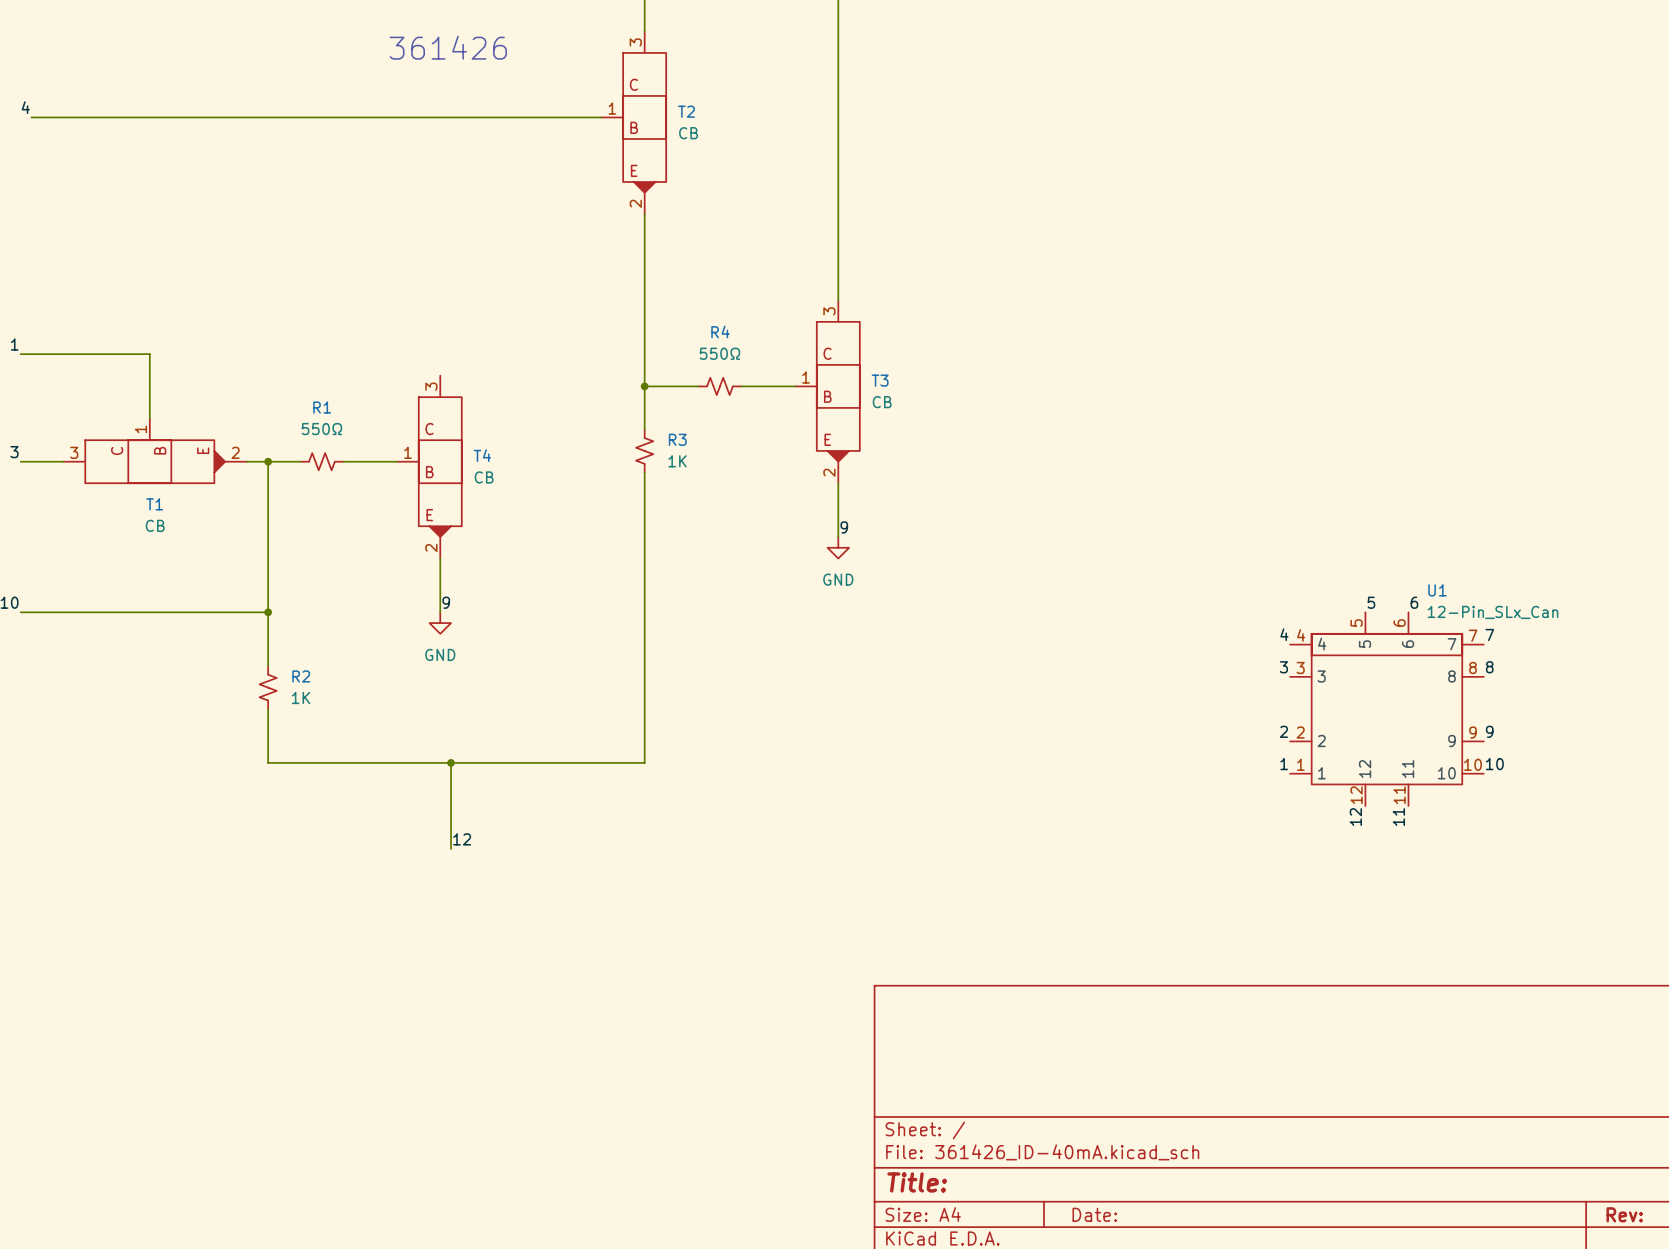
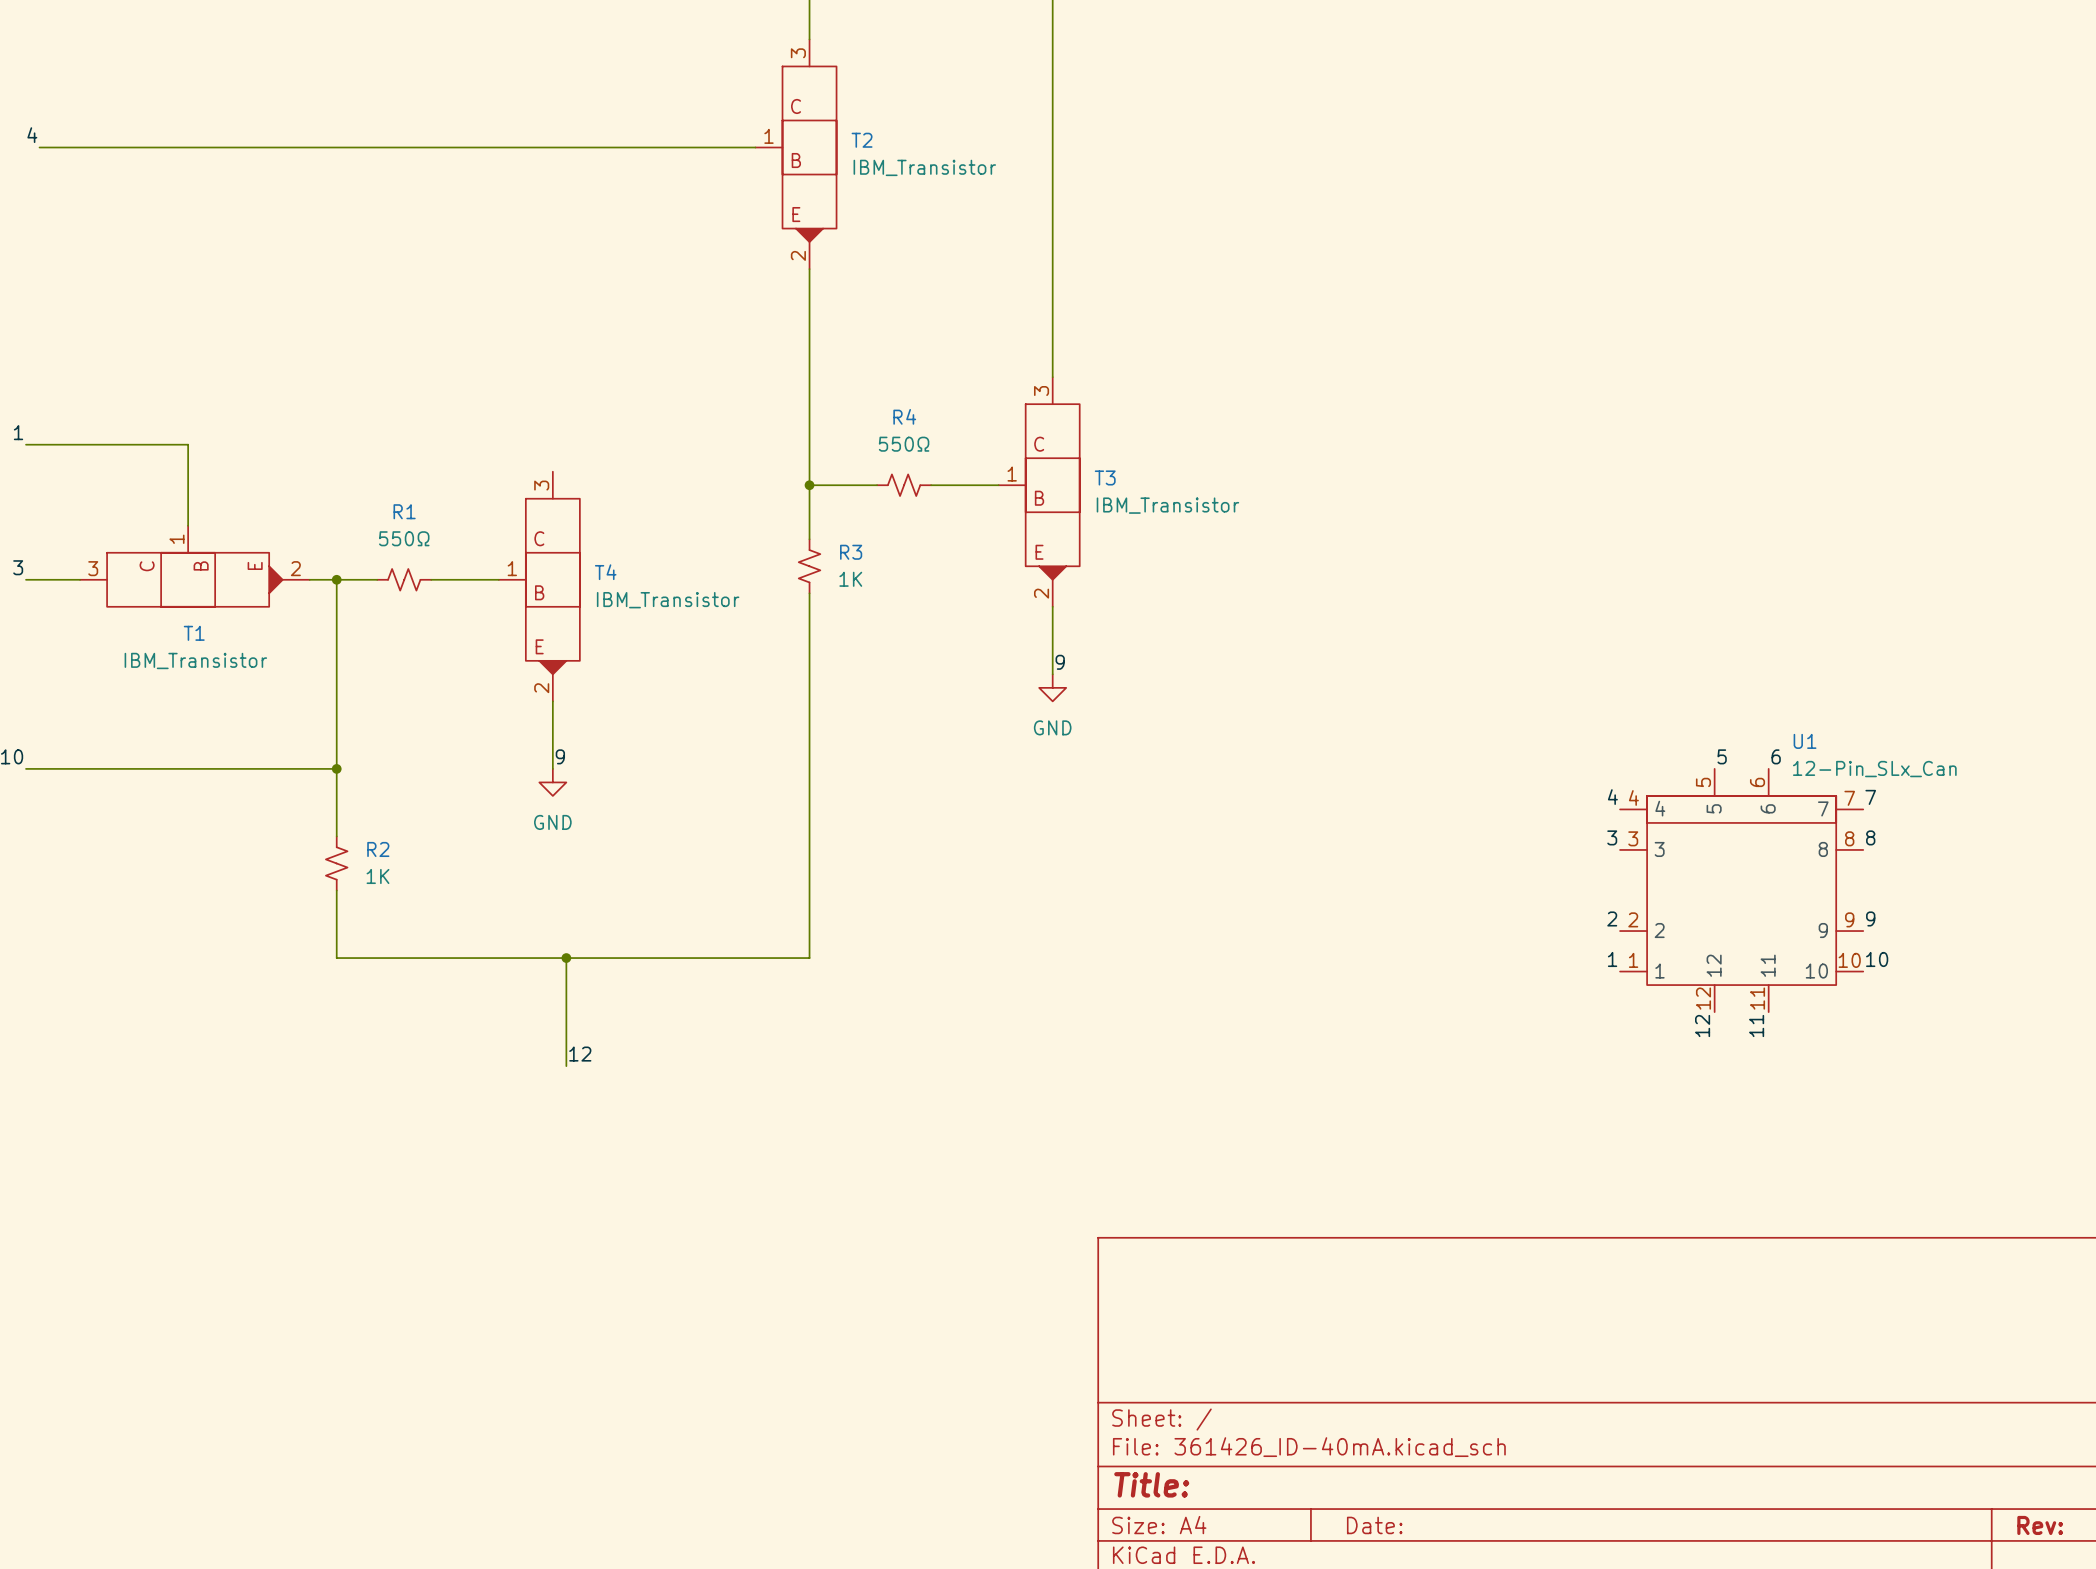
text: 361426 (448, 47) -> none
T2 value: CB (688, 133) -> IBM_Transistor (924, 167)
T3 value: CB (882, 402) -> IBM_Transistor (1167, 505)
T4 value: CB (484, 477) -> IBM_Transistor (668, 600)
T1 value: CB (155, 525) -> IBM_Transistor (195, 660)

